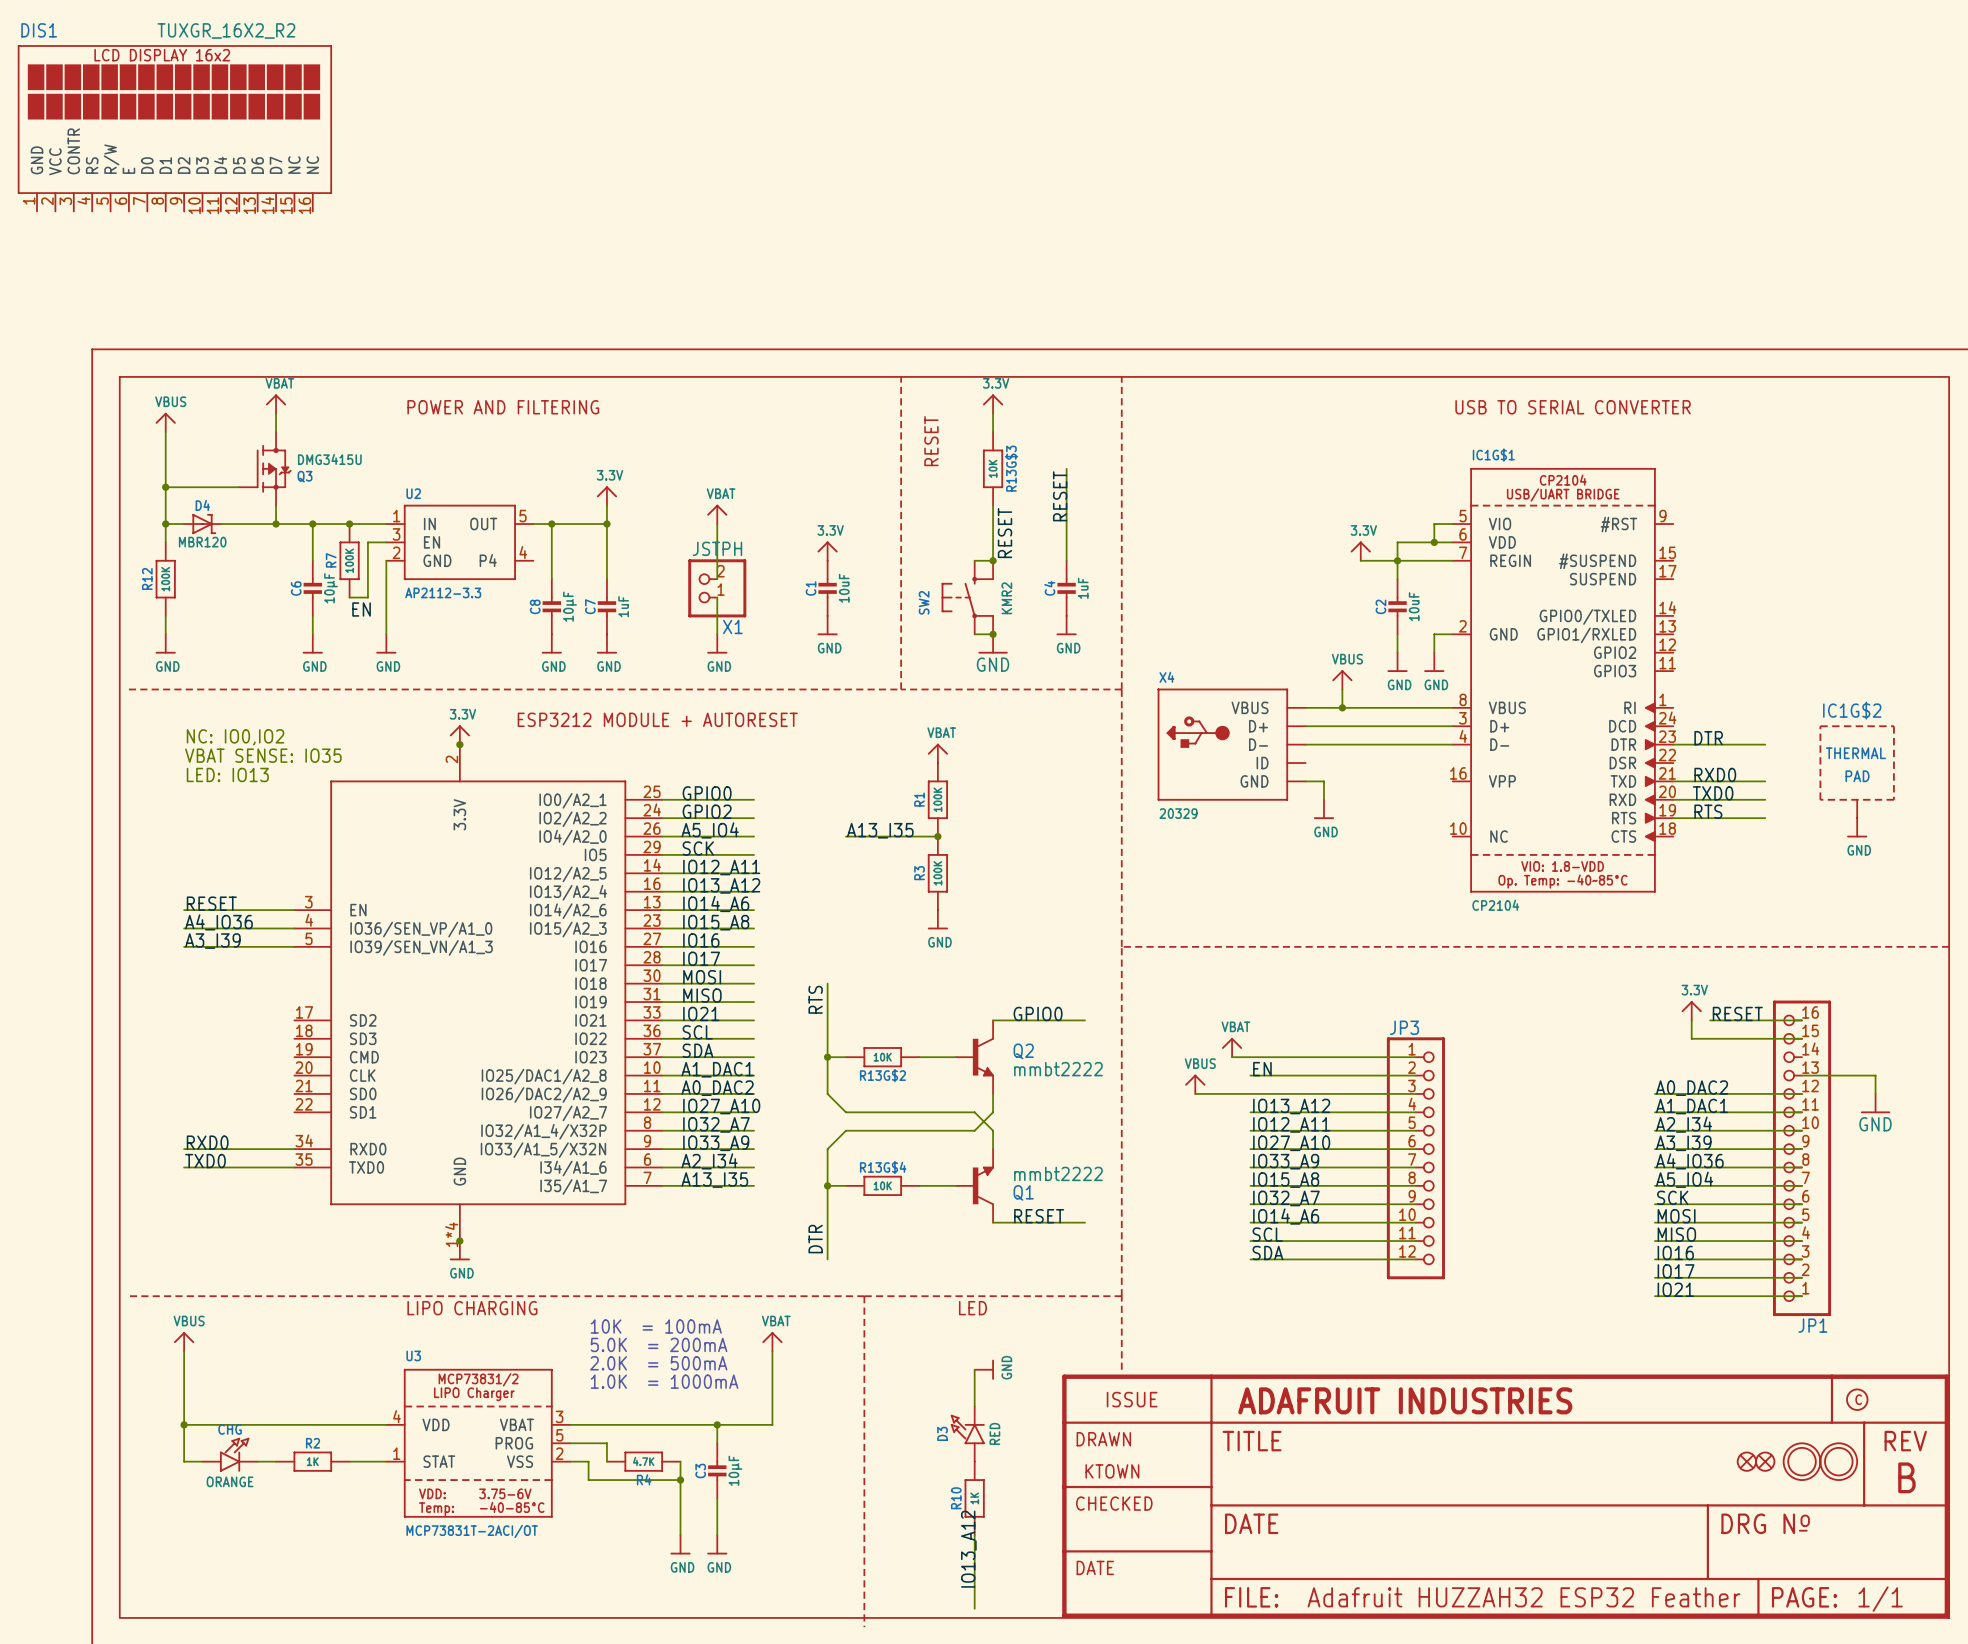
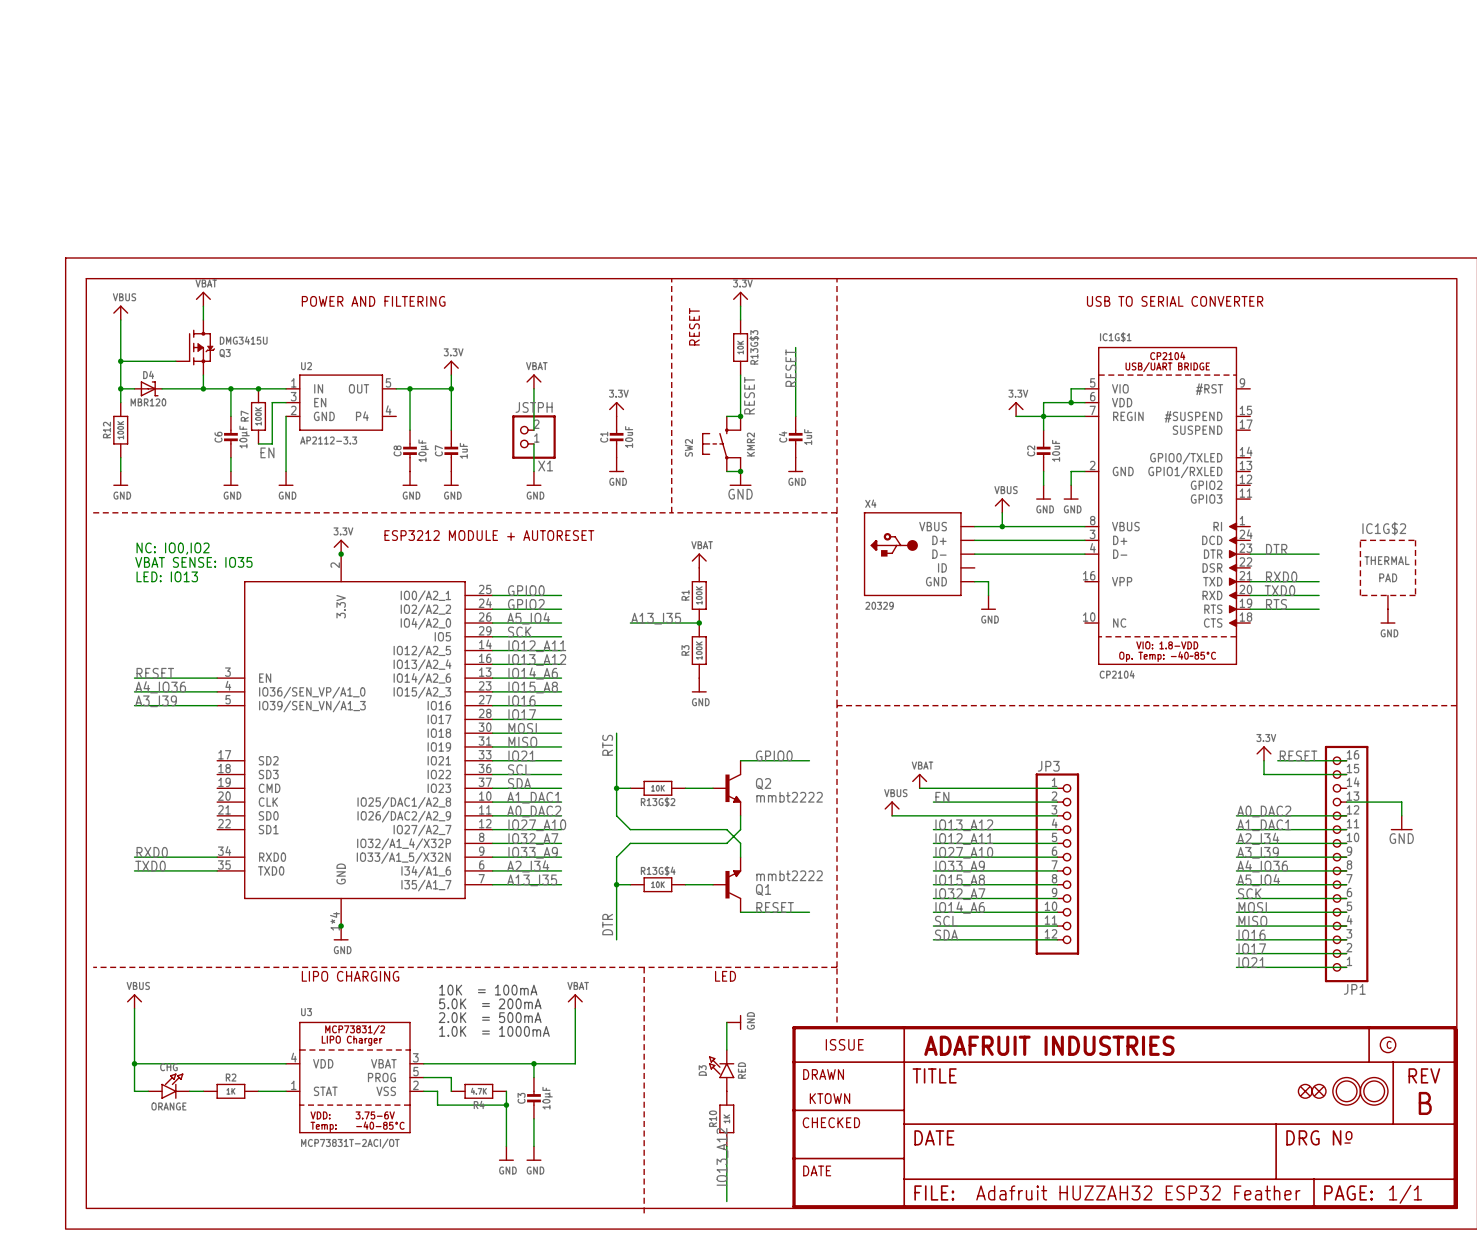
DIS1: TUXGR_16X2_R2 (174, 128) -> none

